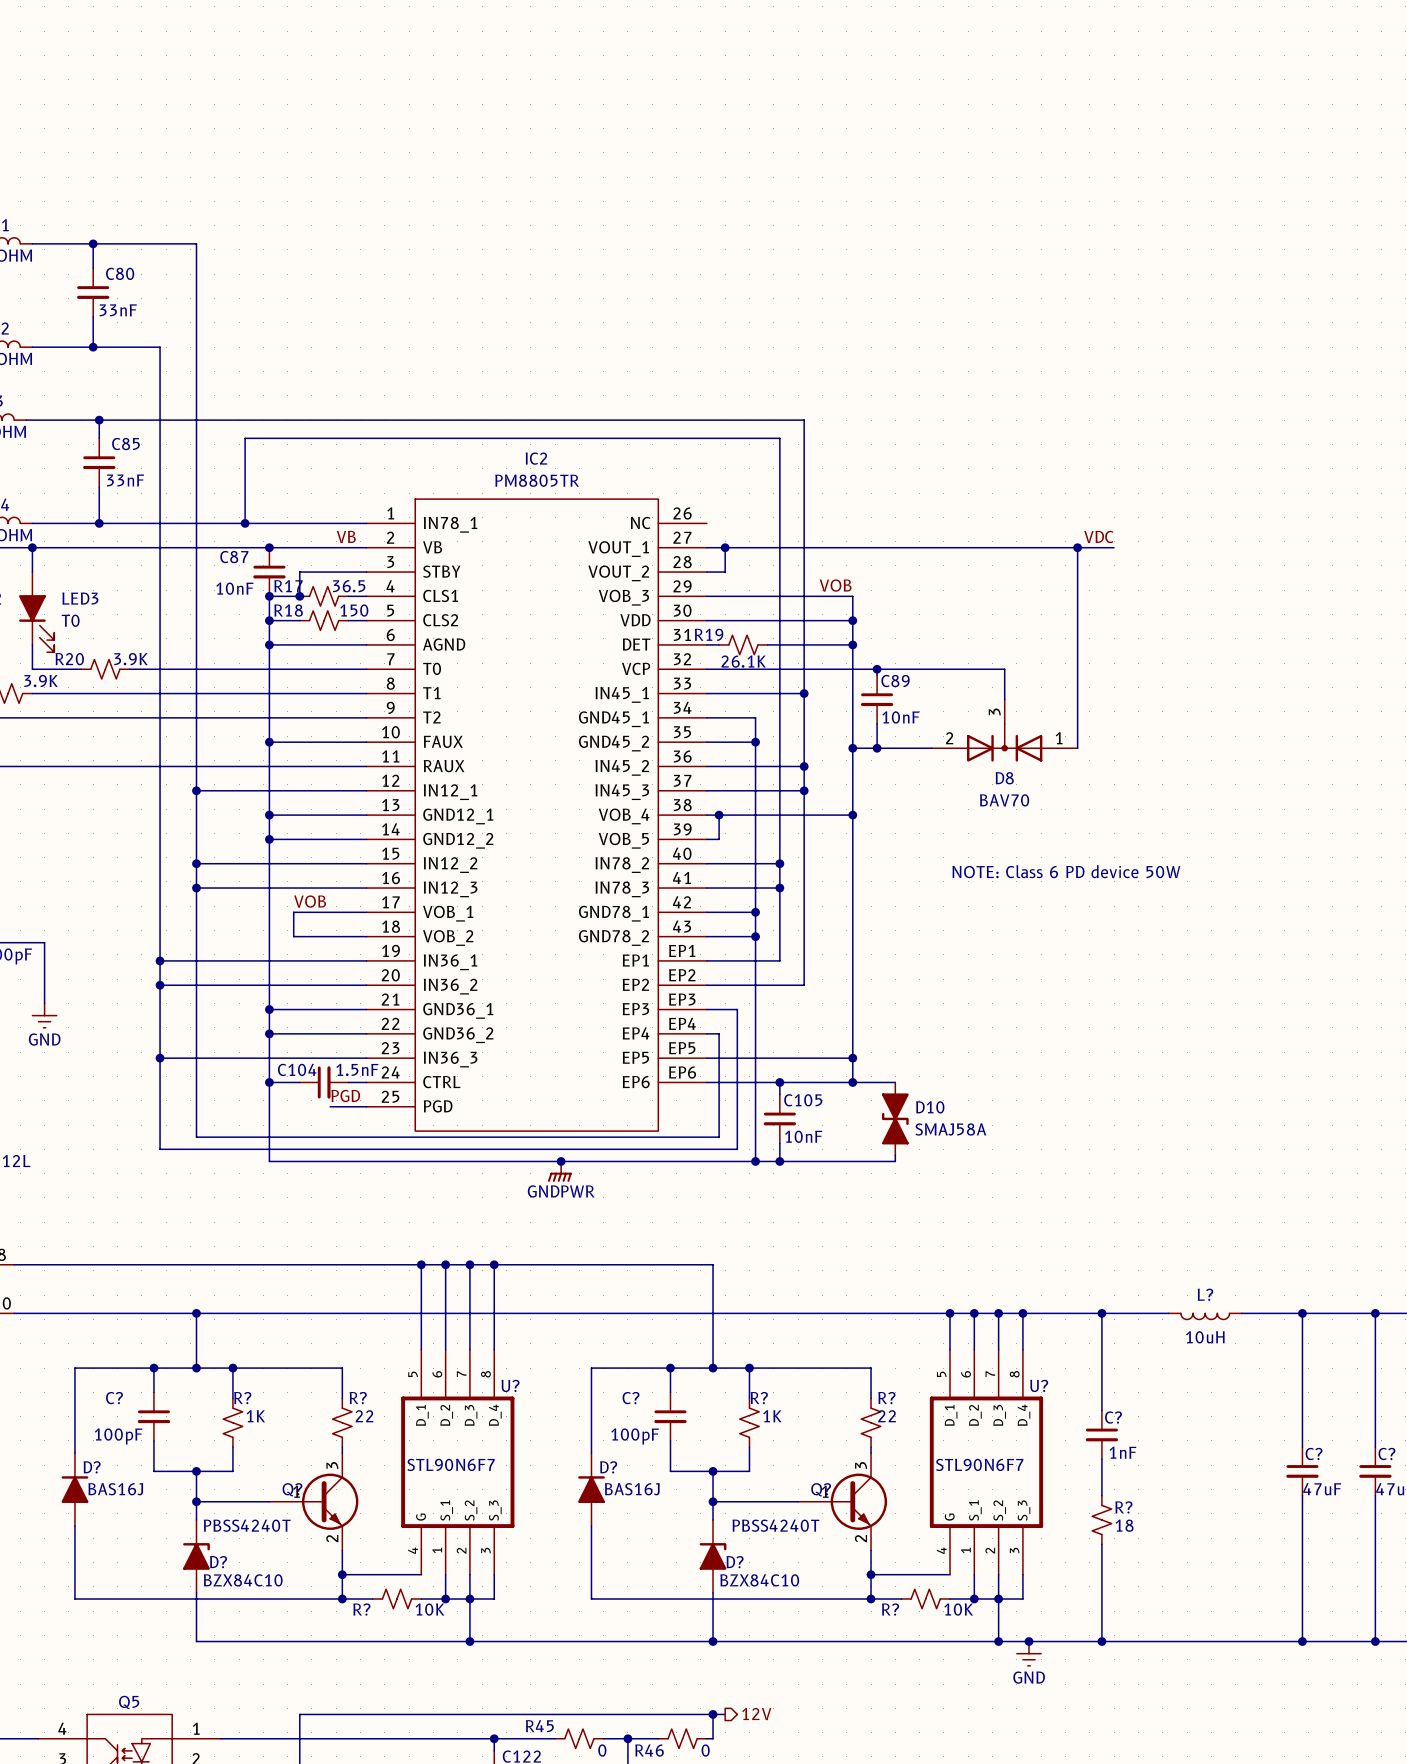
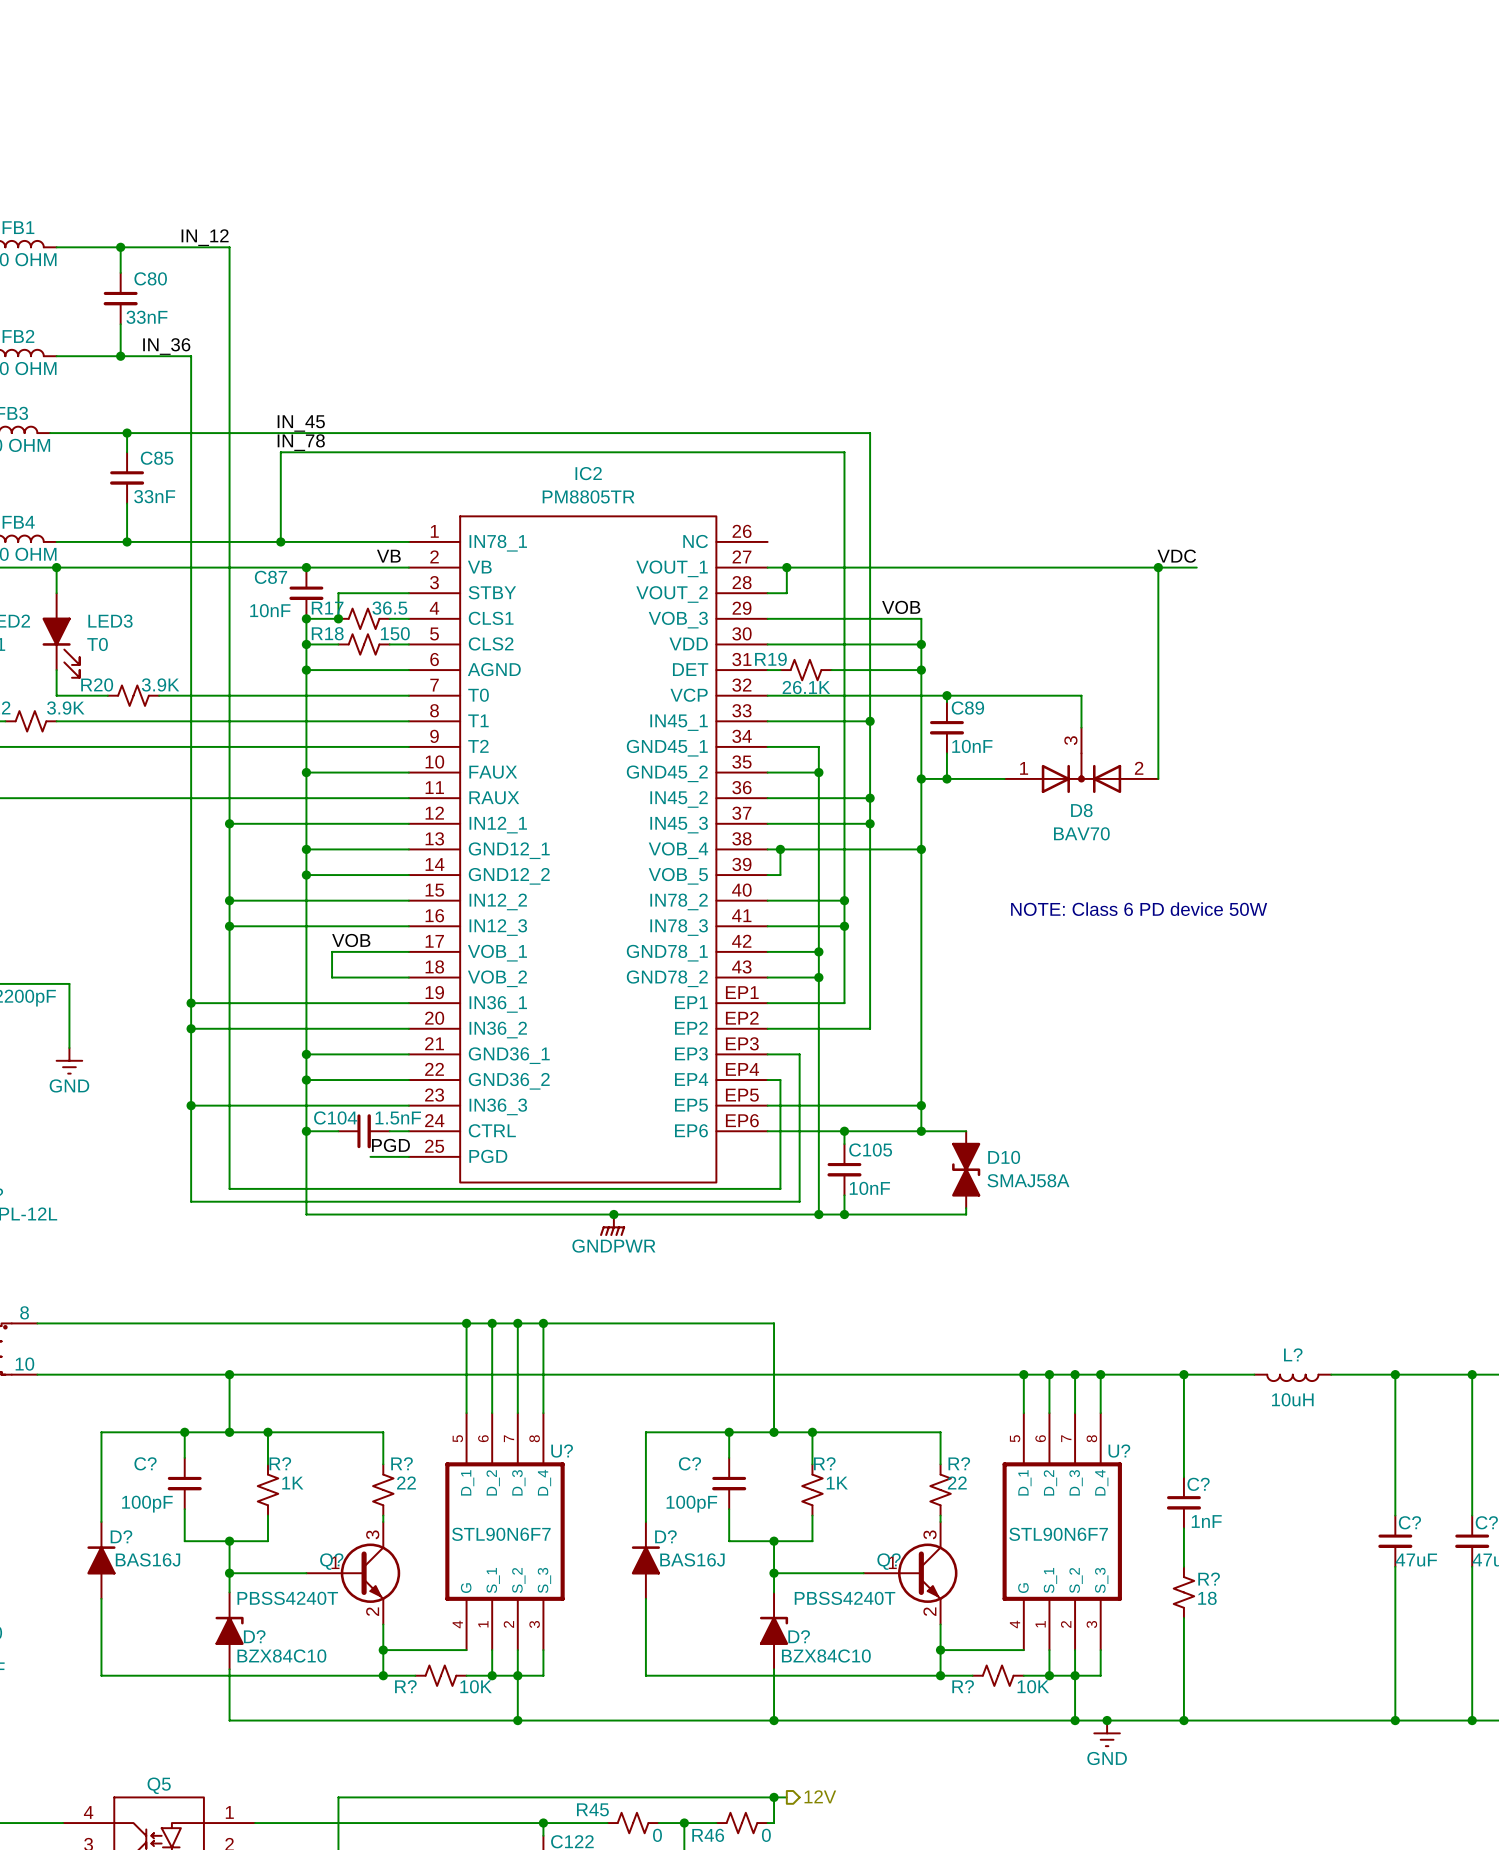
label: none -> IN_12 (205, 237)
label: none -> IN_36 (166, 346)
label: none -> IN_45 (301, 423)
label: none -> IN_78 (301, 442)
D8 flip: as is (1004, 742) -> left-right (1081, 773)

